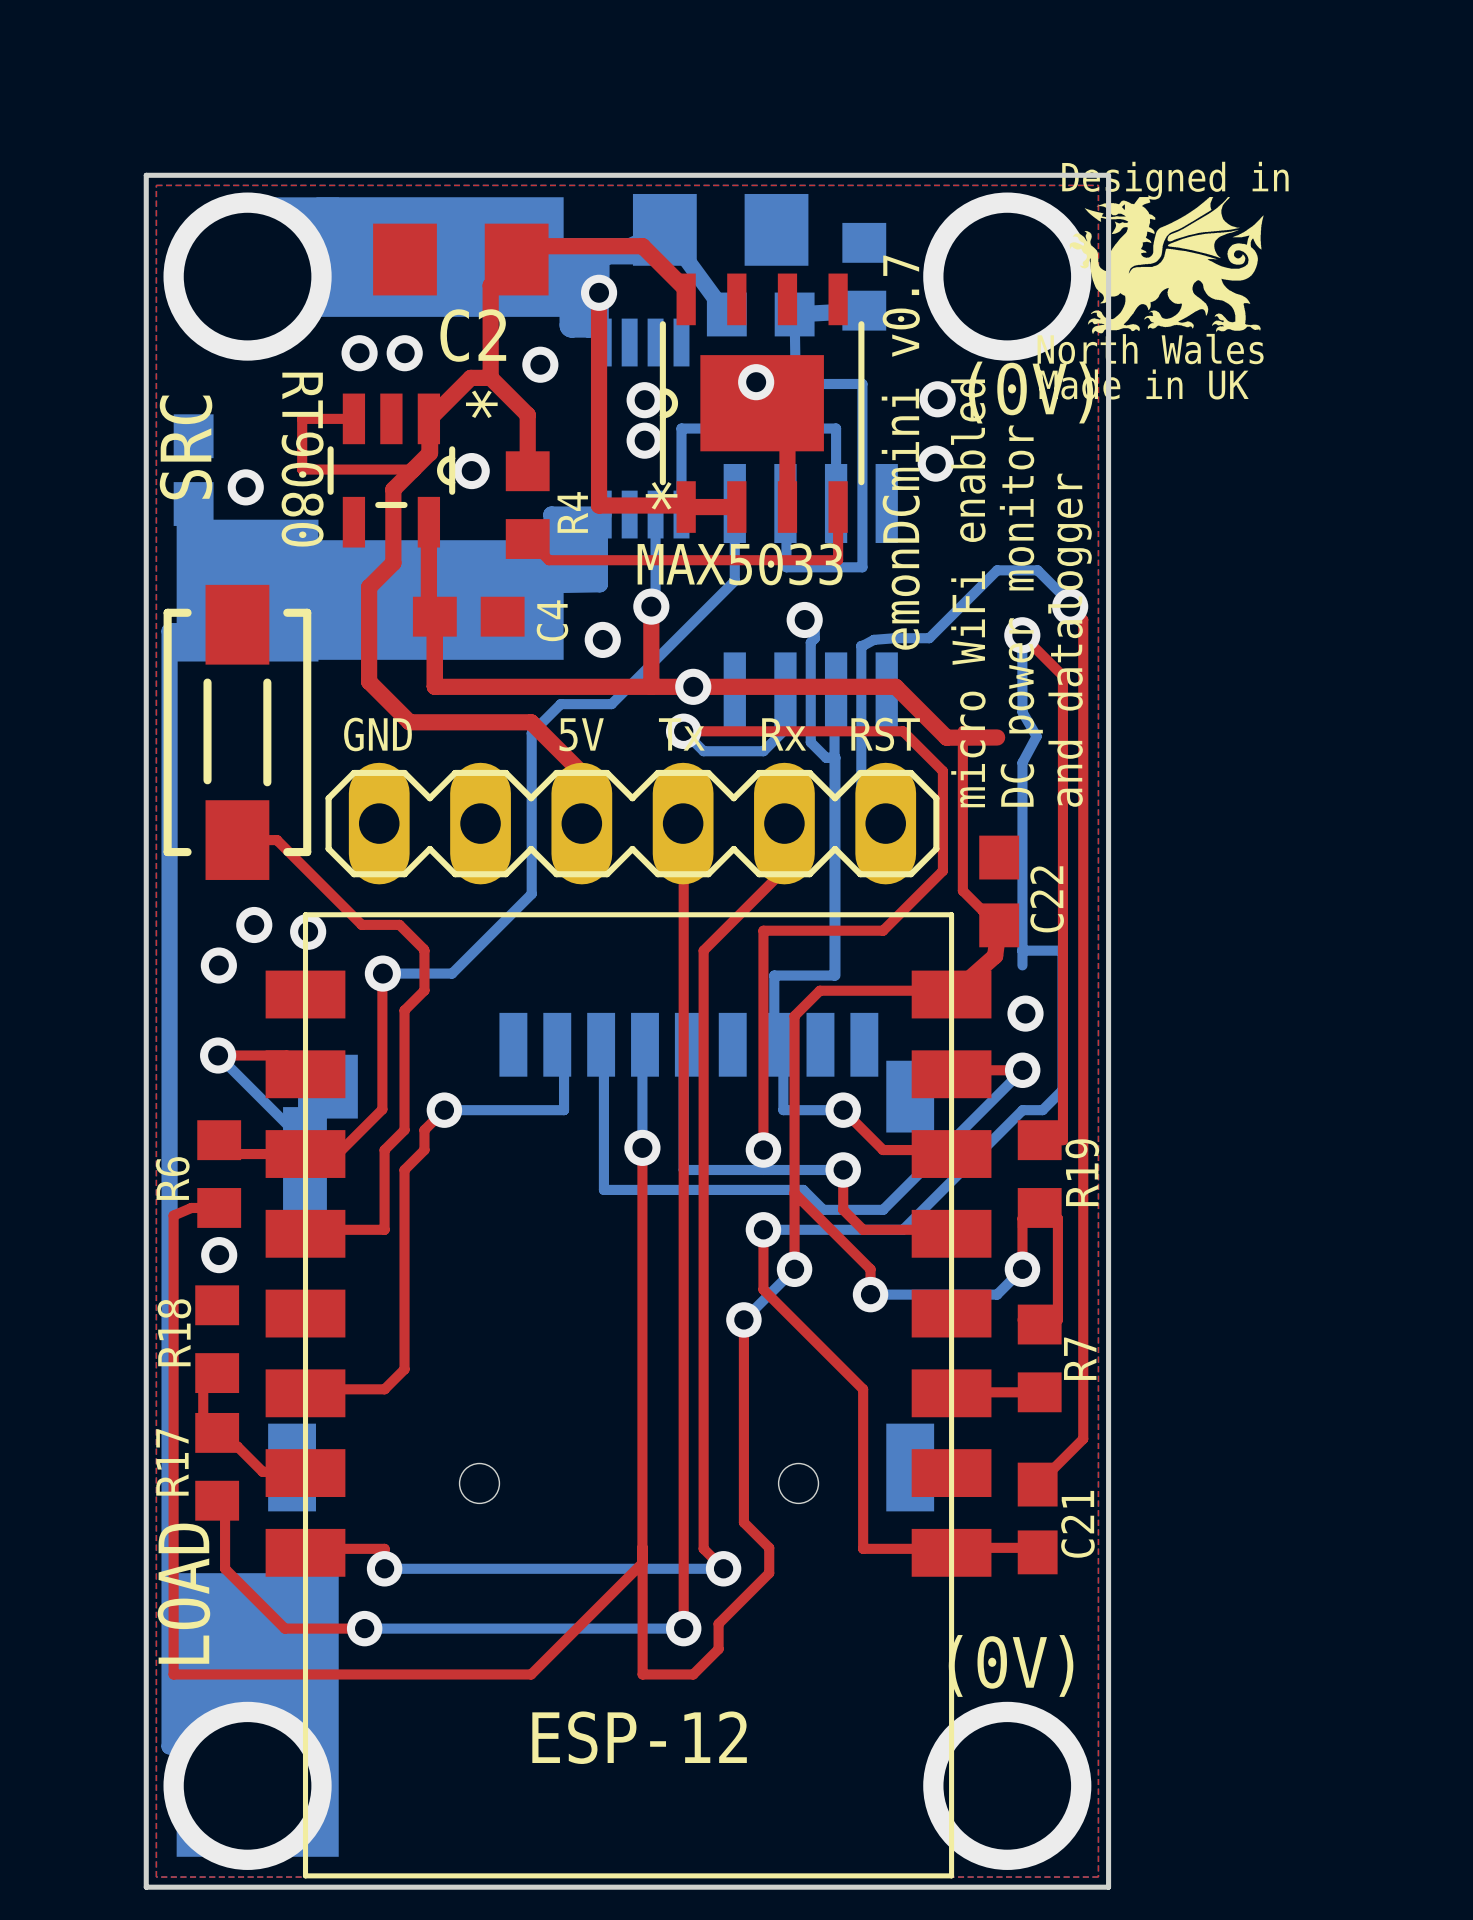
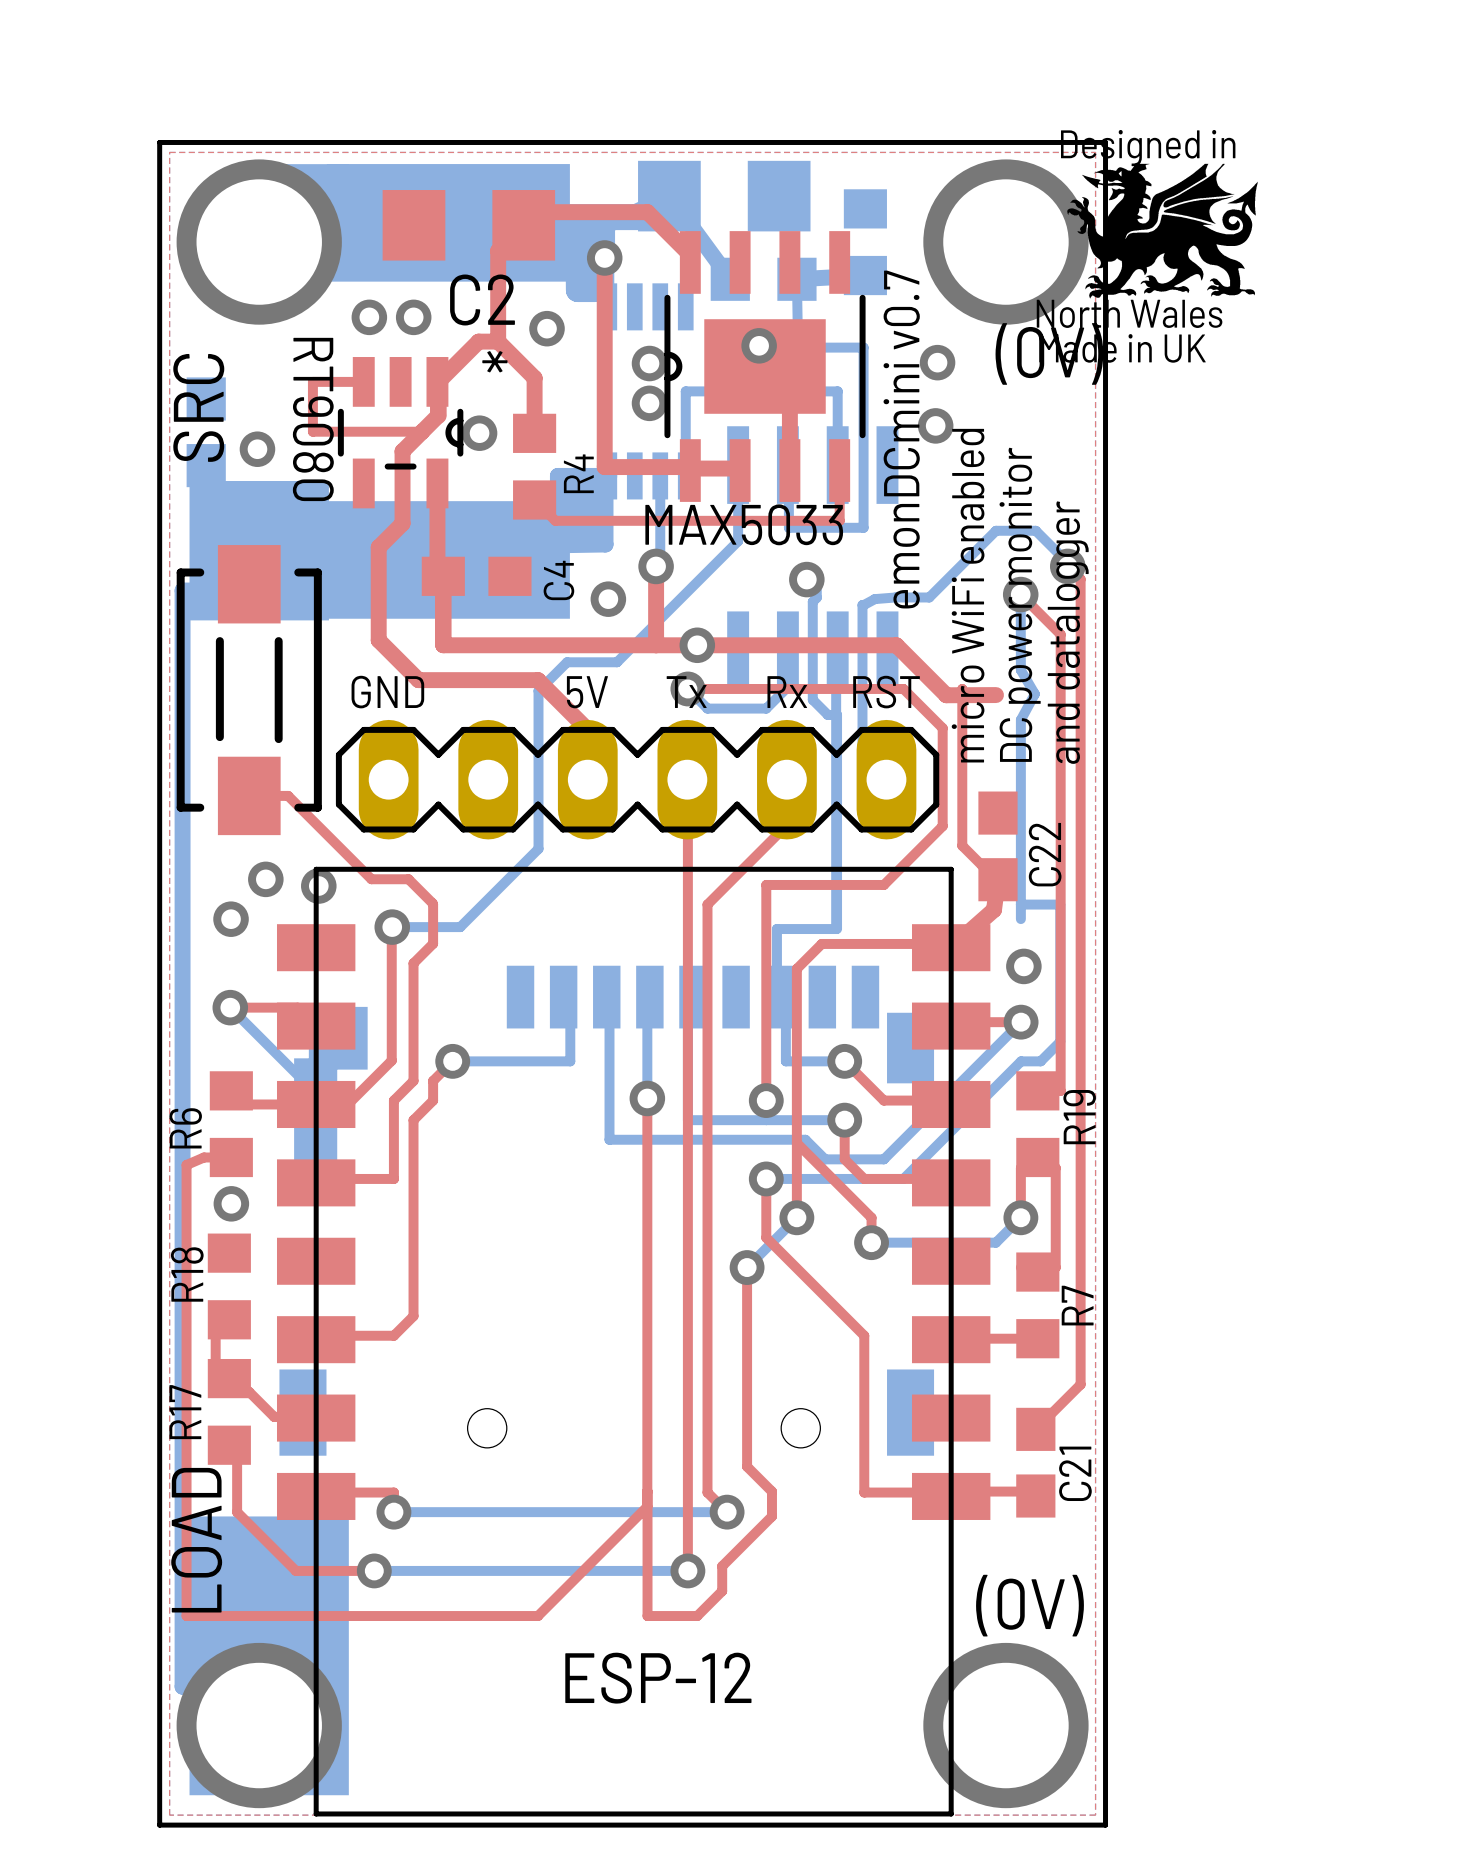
MAX5033 footprint: [659, 273, 865, 533] -> [664, 231, 866, 502]

